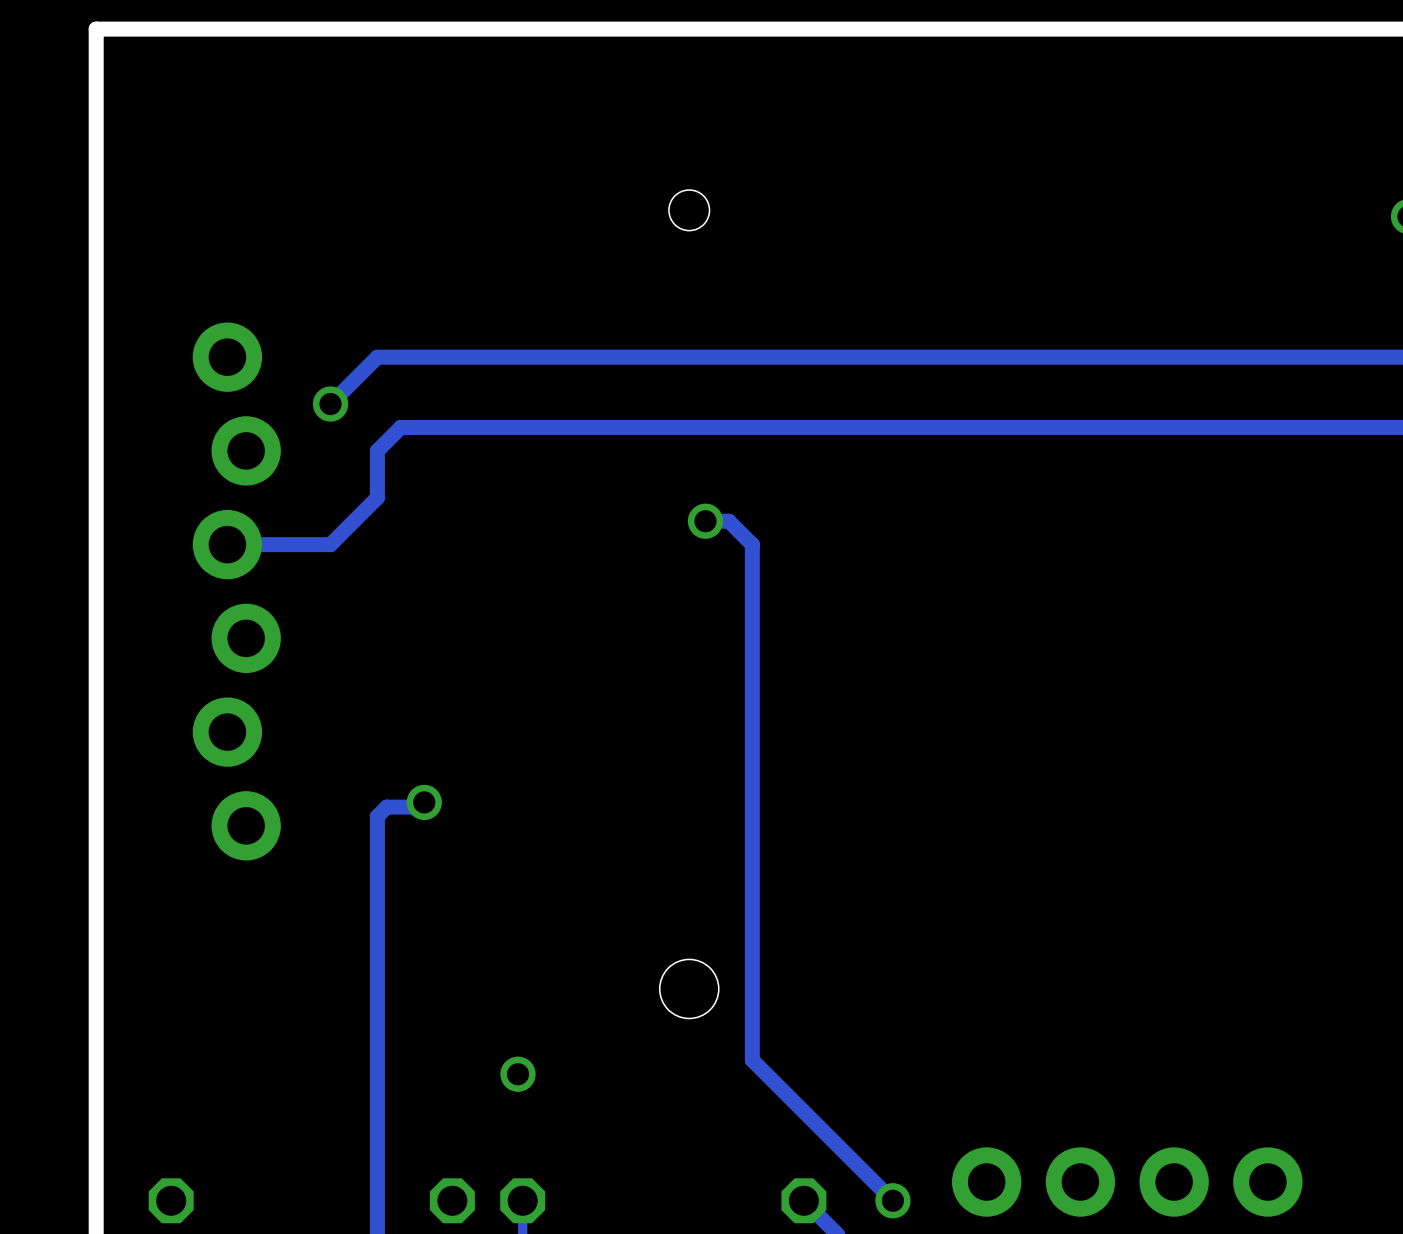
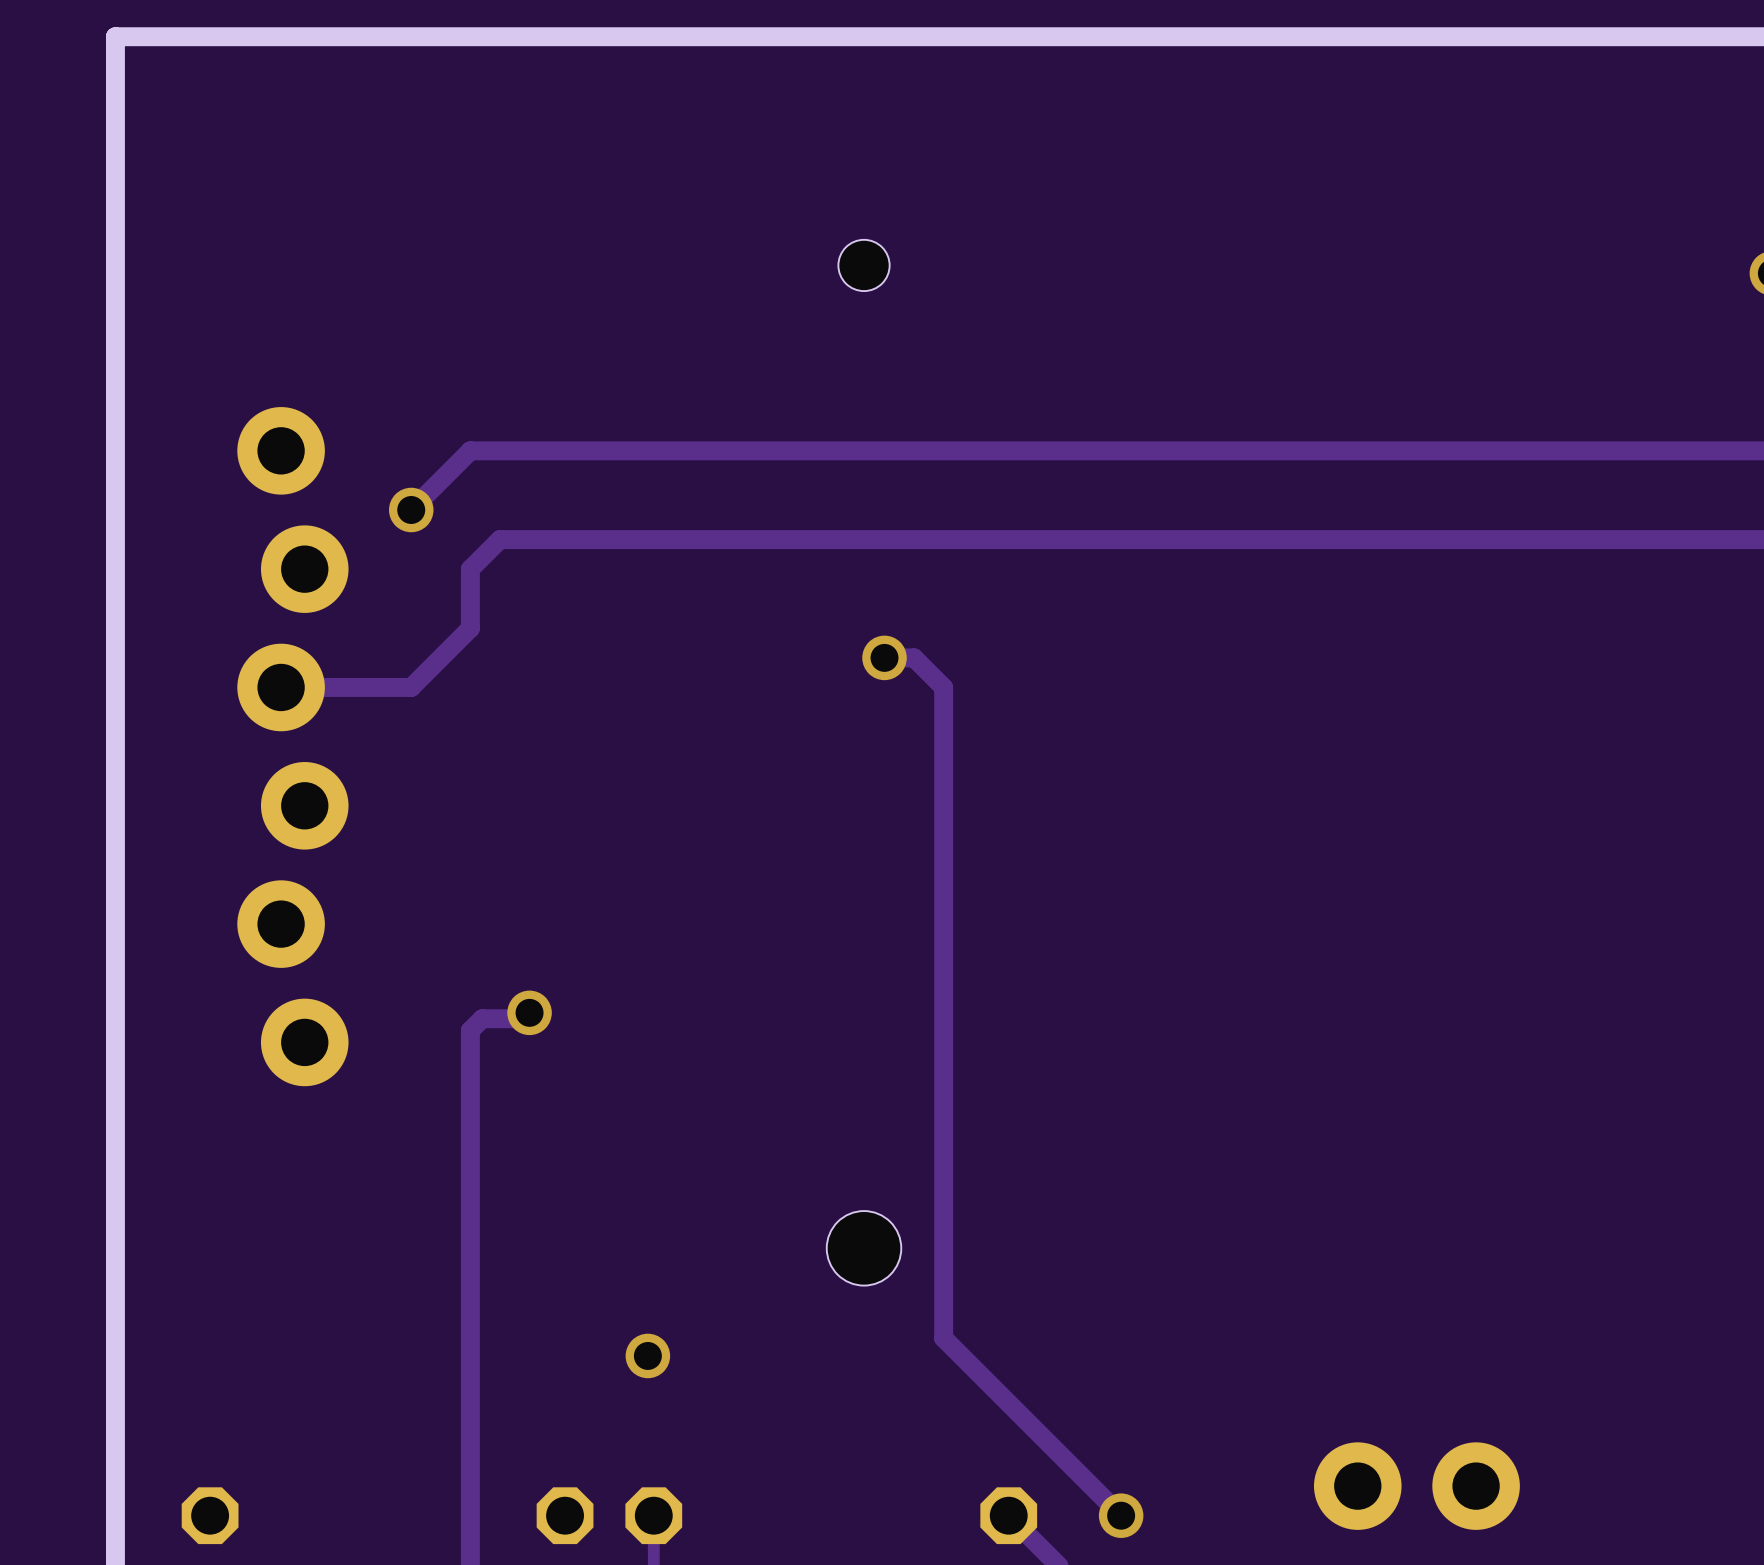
part: none -> (1416, 1486)
part: (1033, 1182) -> none
part: (1221, 1182) -> none

